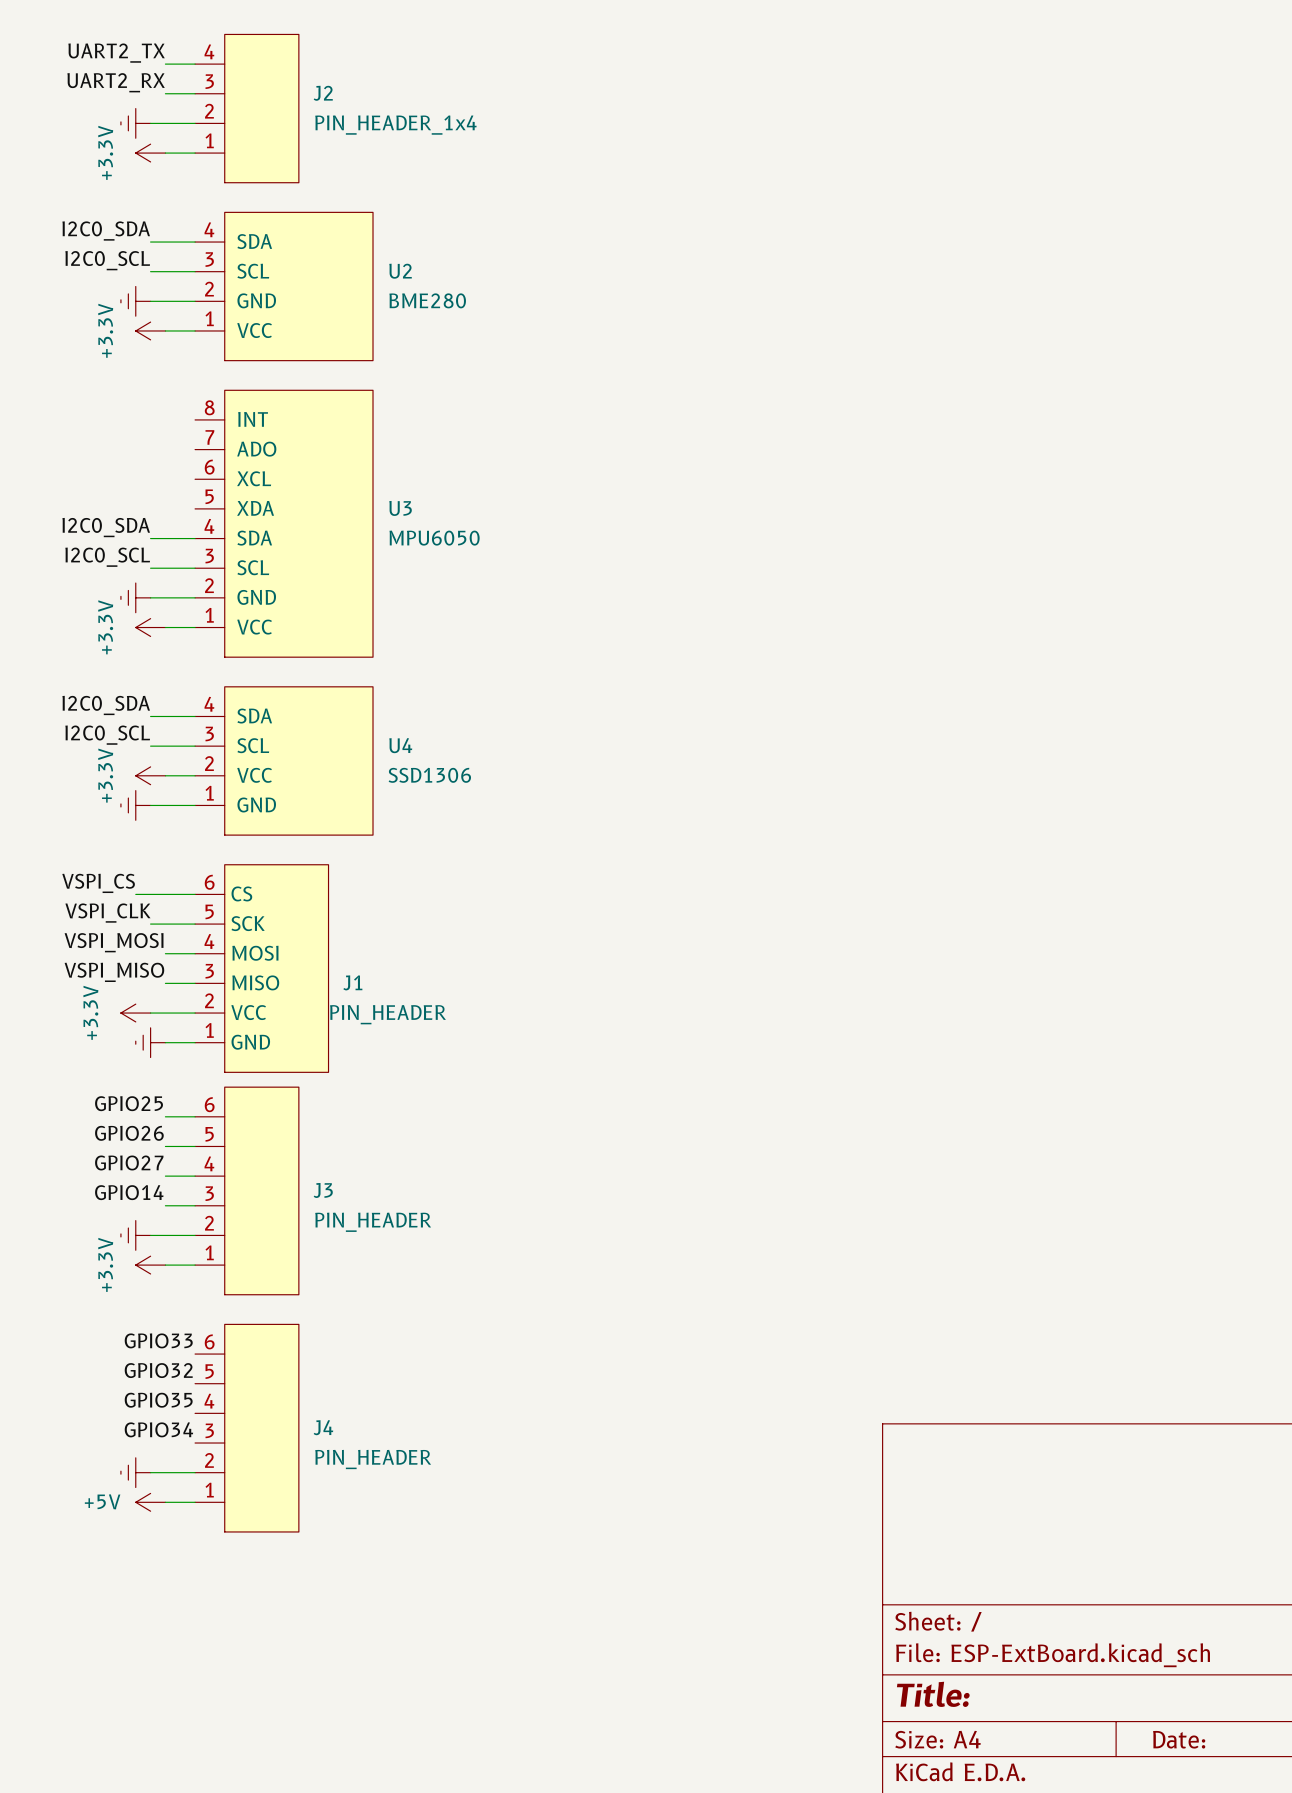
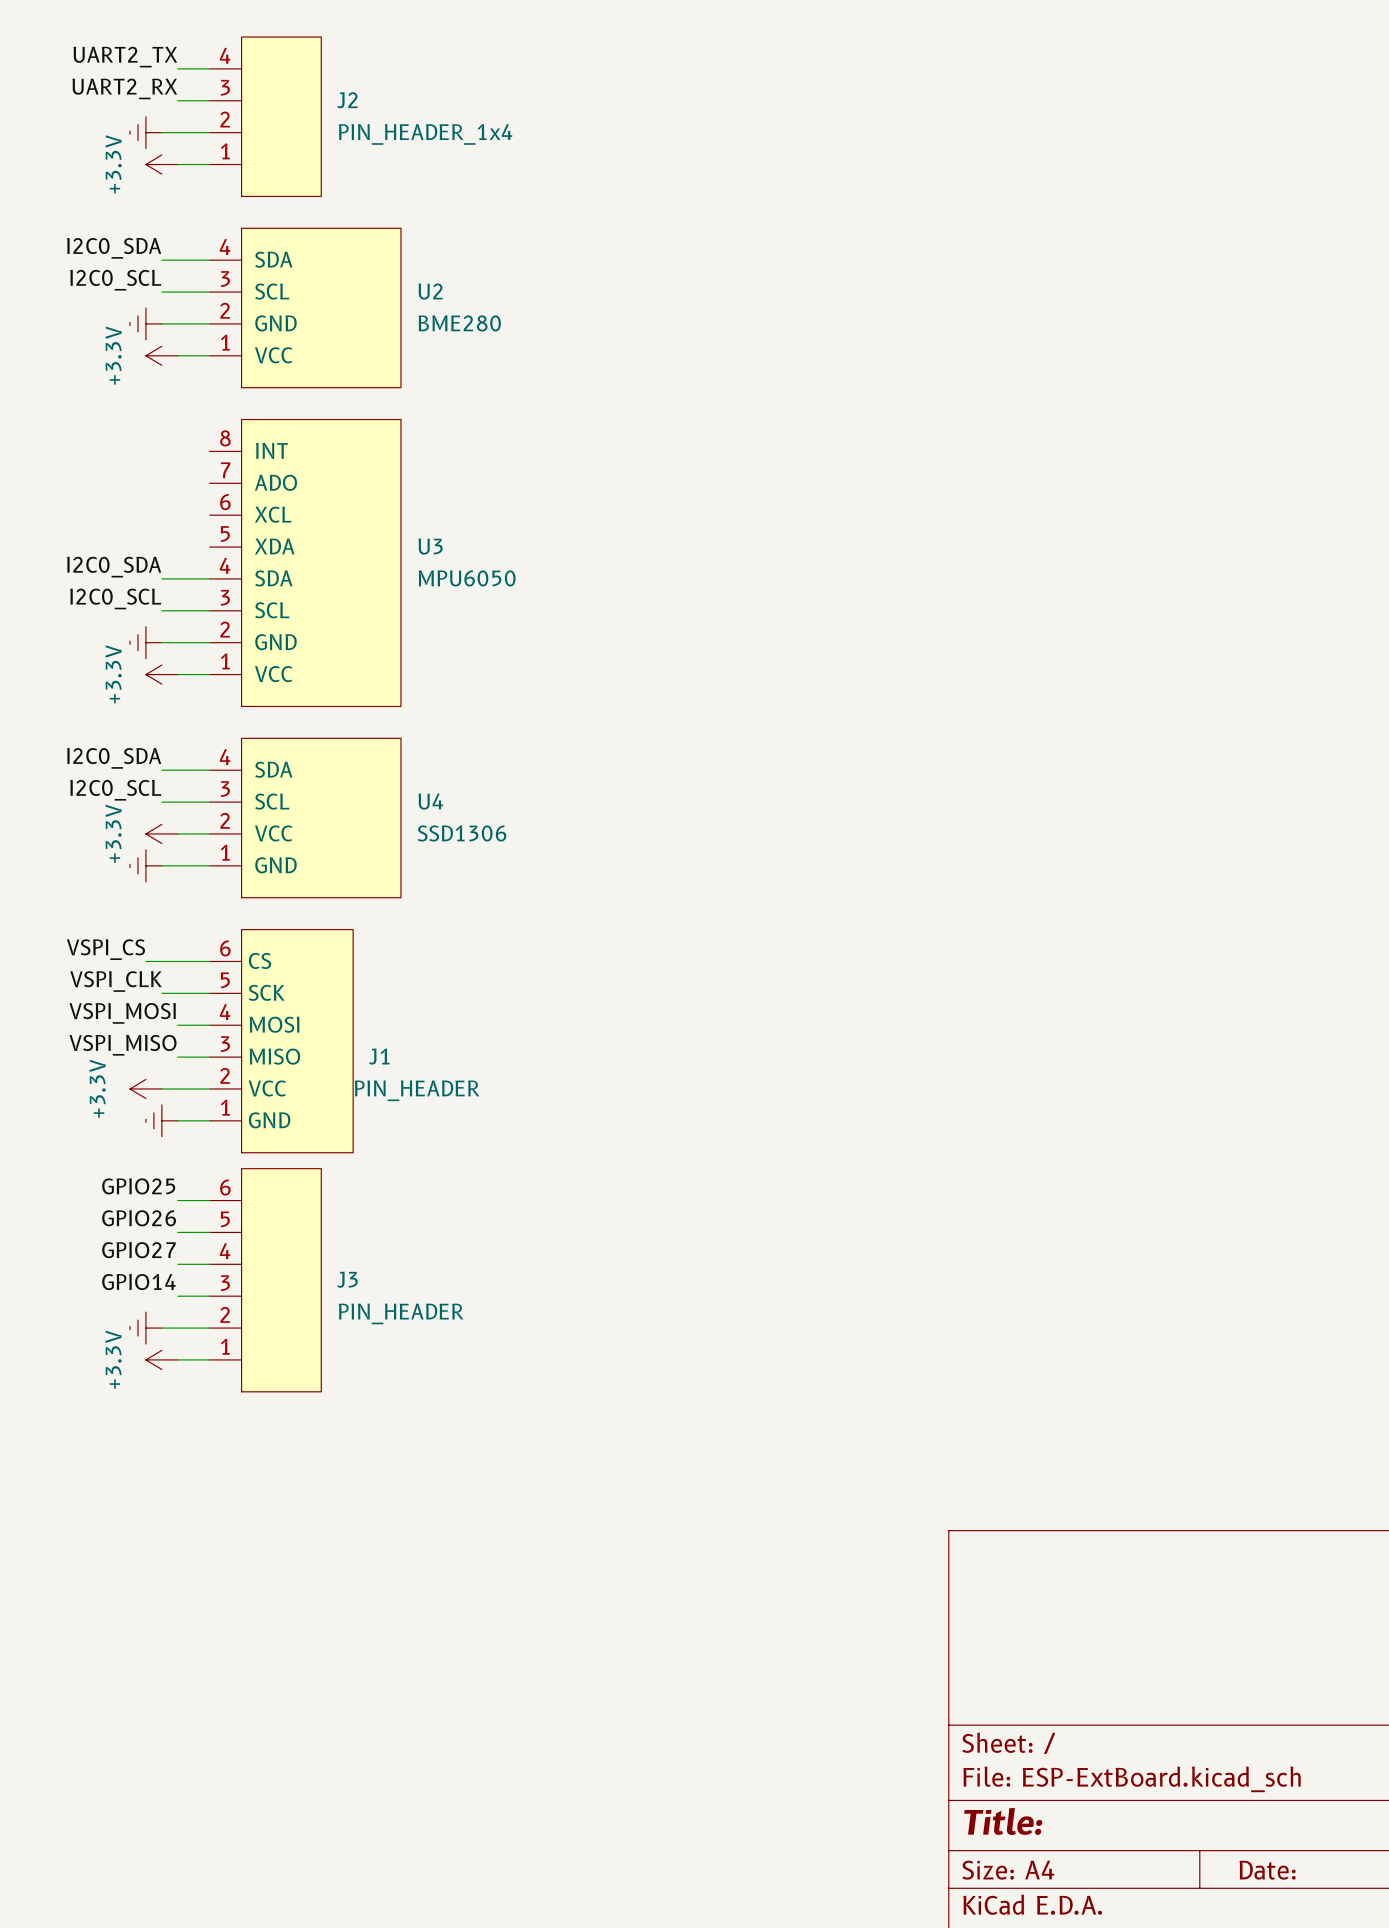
label: GPIO33 (158, 1340) -> none
label: GPIO32 (158, 1370) -> none
label: GPIO35 (158, 1400) -> none
J4: PIN_HEADER (246, 1428) -> none
label: GPIO34 (158, 1429) -> none
power symbol: (135, 1472) -> none
wire: (150, 1472) (195, 1472) -> none
power symbol: +5V (150, 1502) -> none
wire: (165, 1502) (195, 1502) -> none

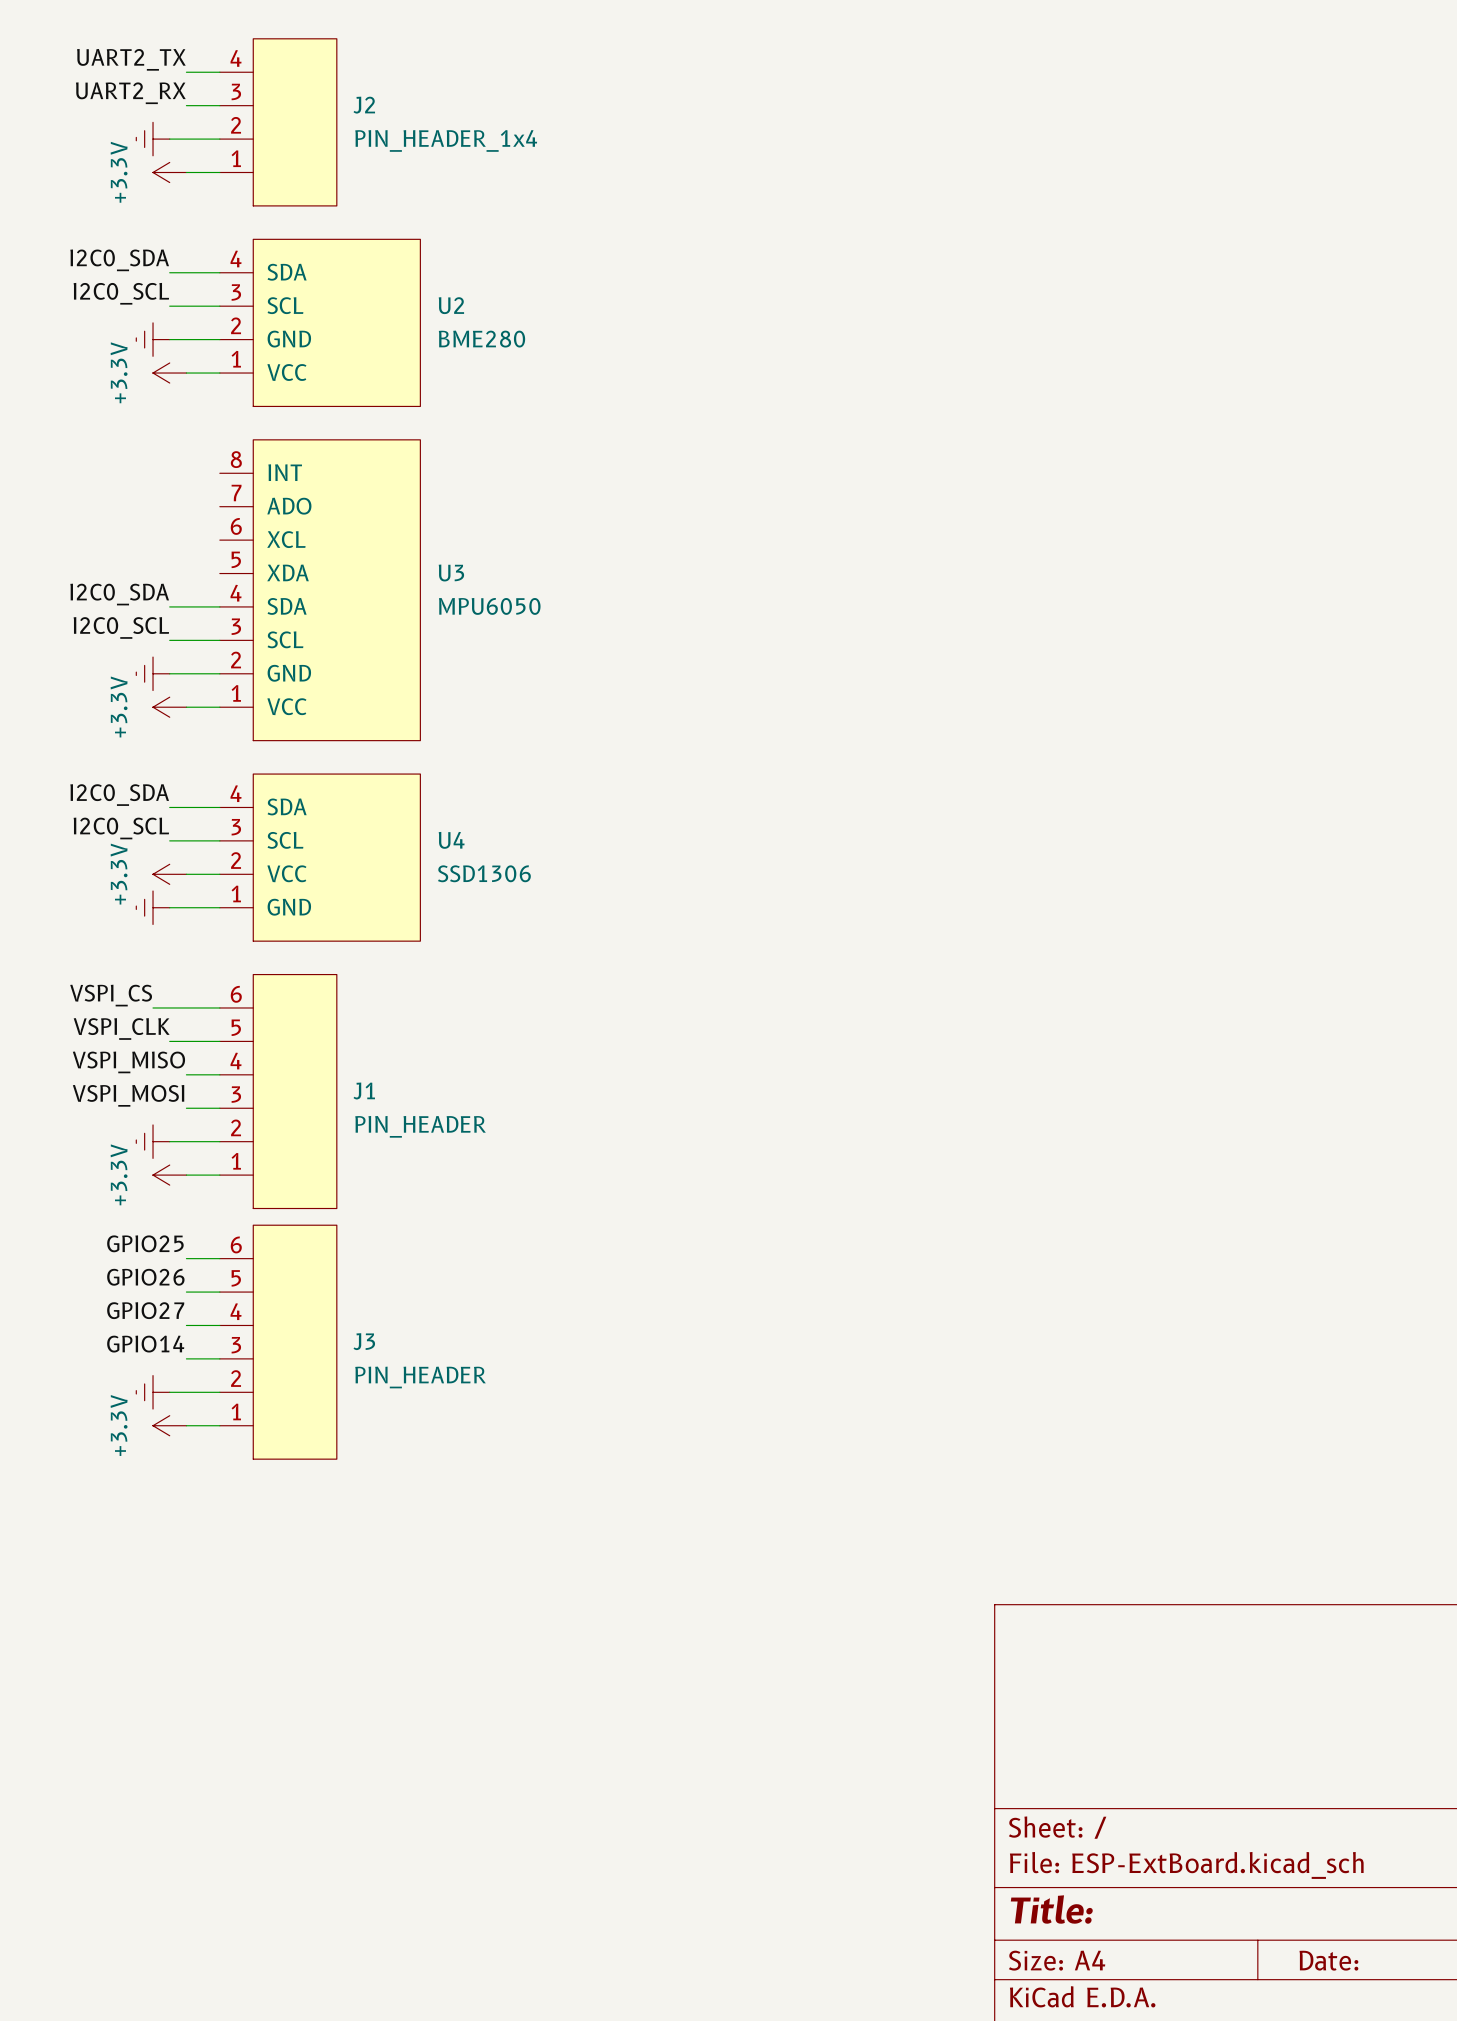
J1 symbol: [209, 929, 354, 1153] -> [219, 974, 337, 1209]
label: VSPI_MOSI (122, 1013) -> VSPI_MISO (128, 1062)
label: VSPI_MISO (123, 1045) -> VSPI_MOSI (128, 1095)
power symbol shape: [130, 1079, 162, 1099] -> [136, 1124, 170, 1159]
power symbol text: +3.3V (97, 1088) -> none
power symbol shape: [145, 1104, 178, 1137] -> [153, 1165, 187, 1186]
power symbol text: none -> +3.3V (119, 1174)

